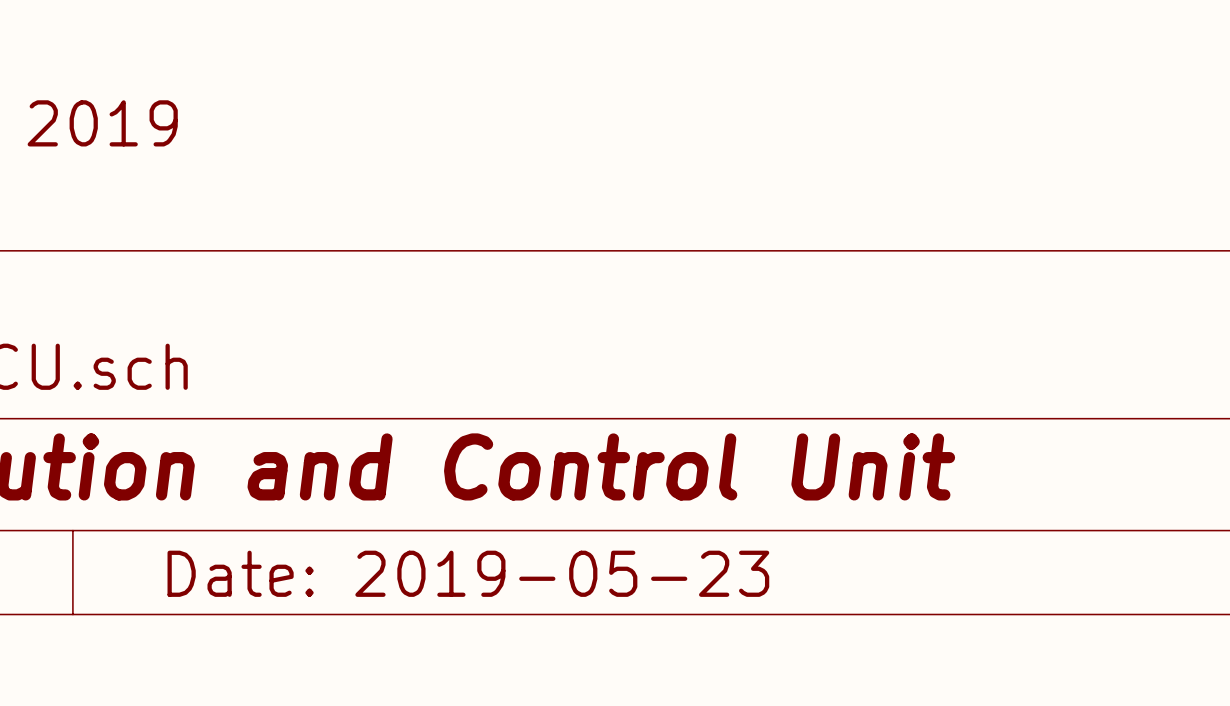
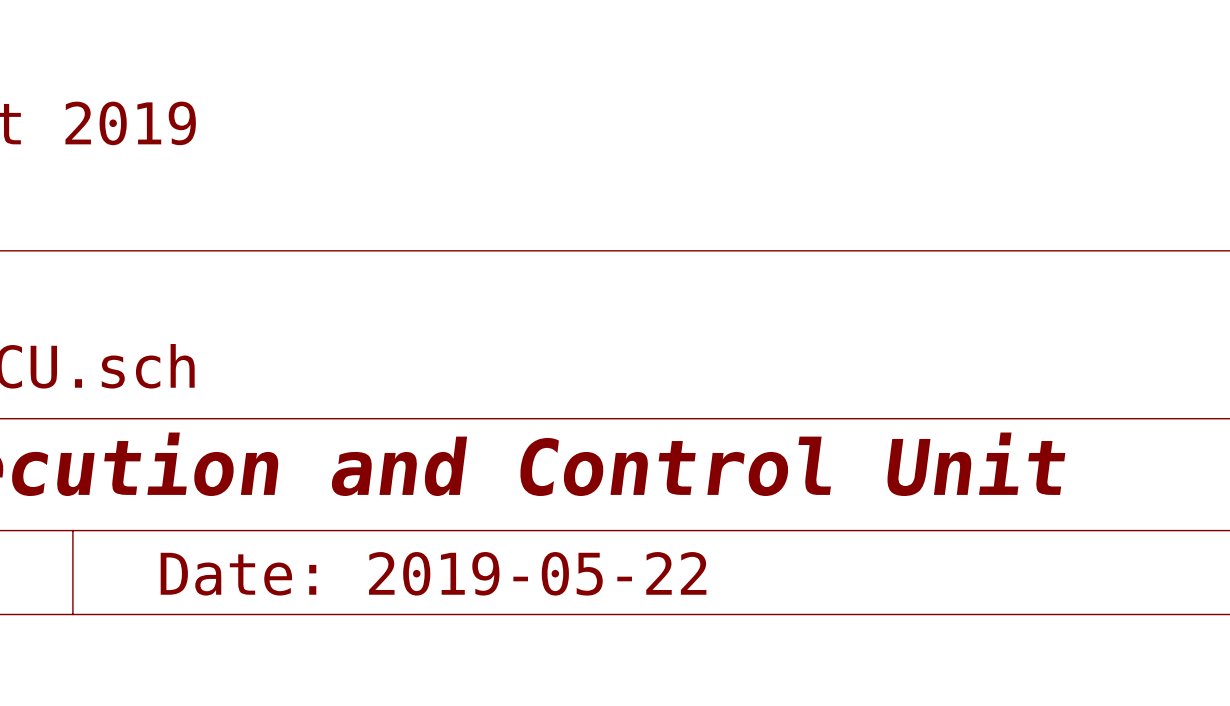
title block: Date: 2019-05-23 (468, 573) -> Date: 2019-05-22 (433, 573)

